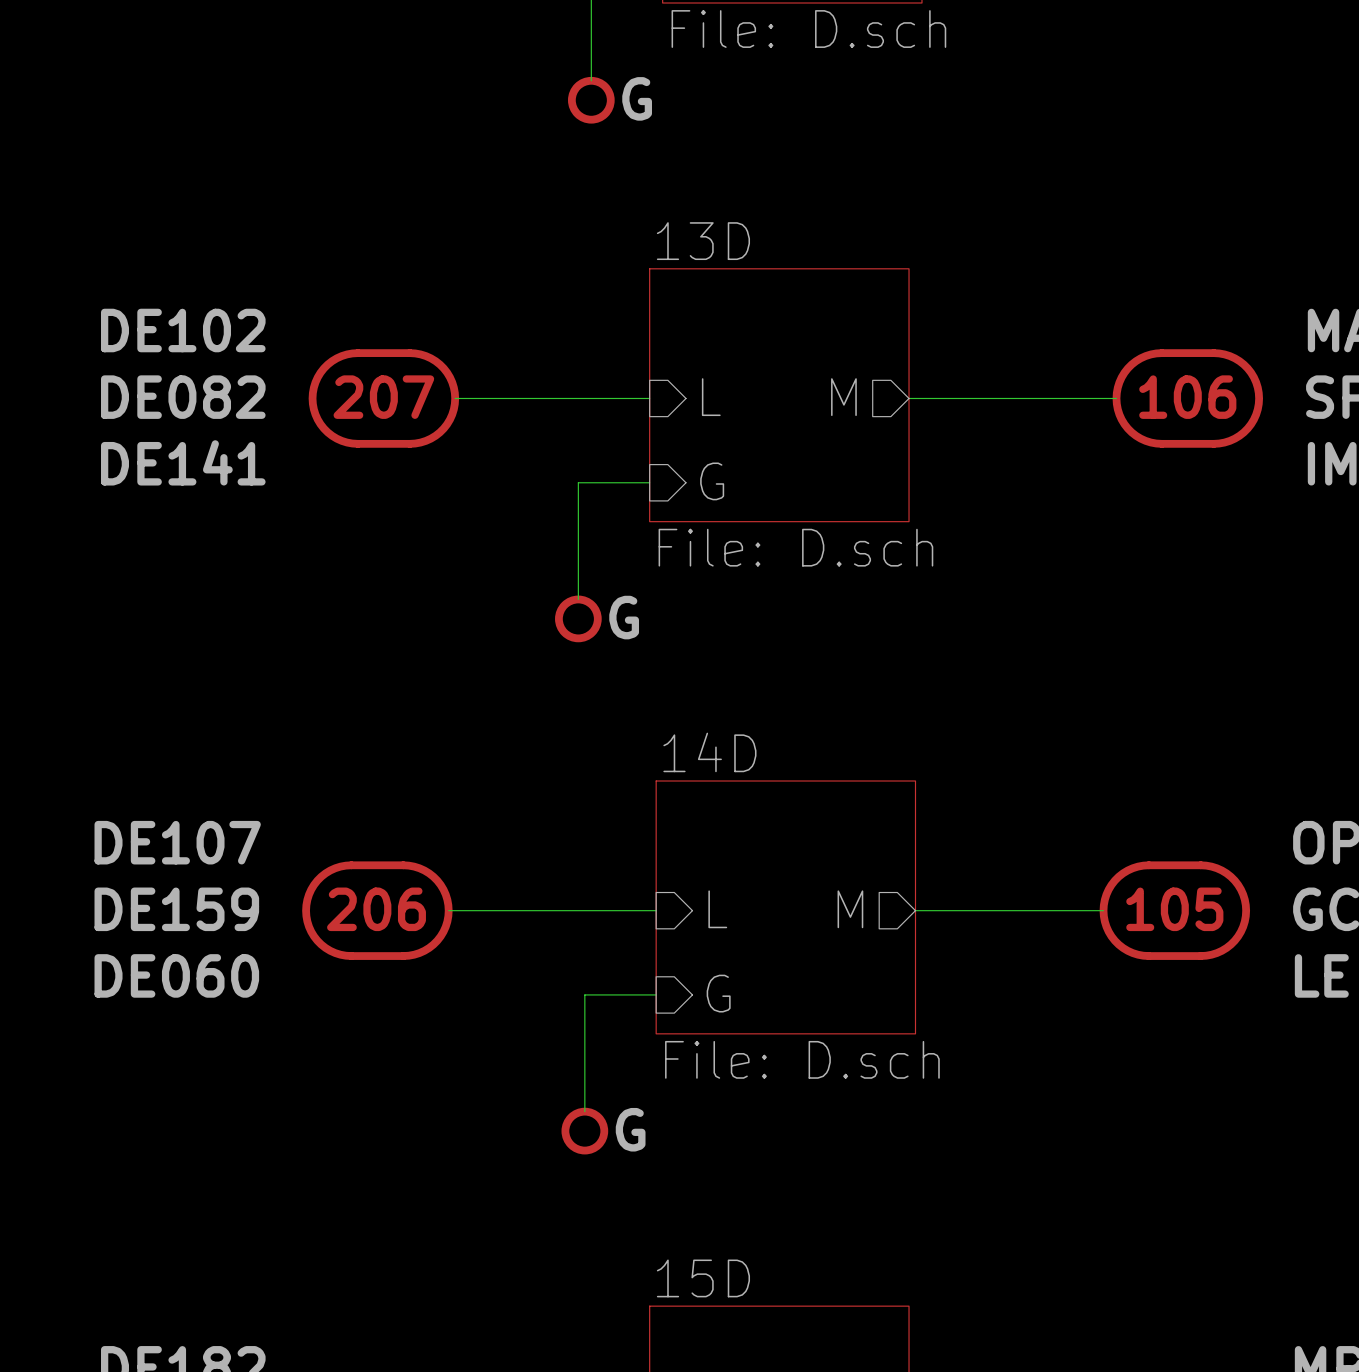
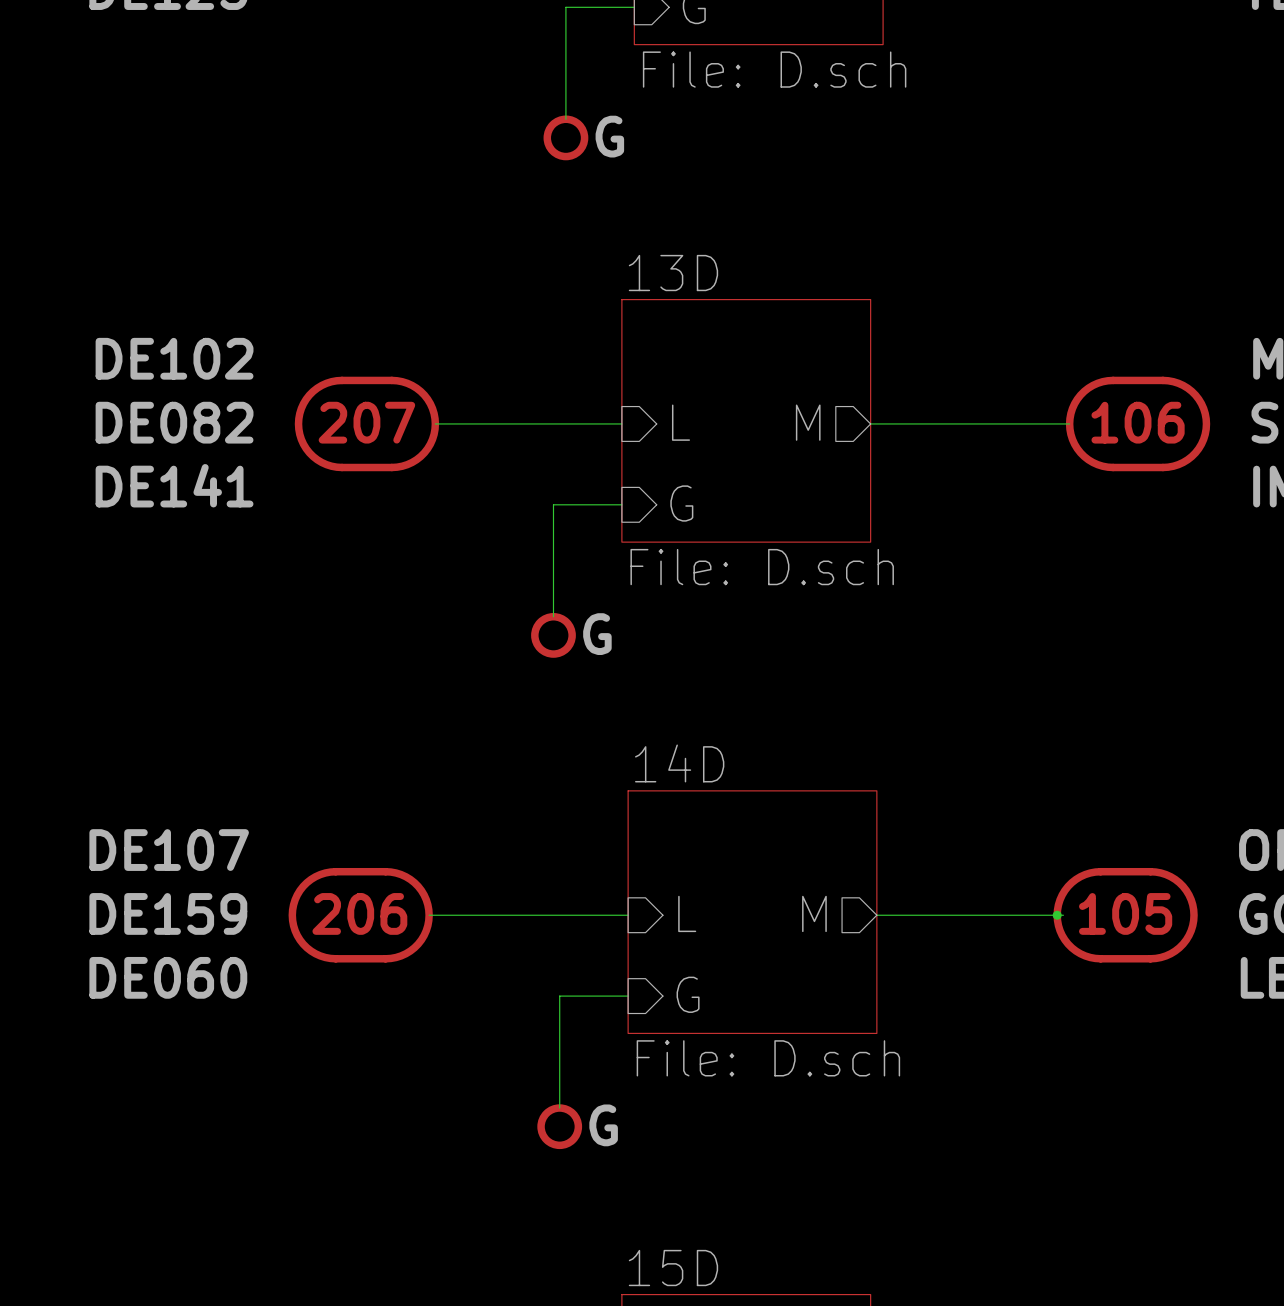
junction: none -> (1057, 915)

